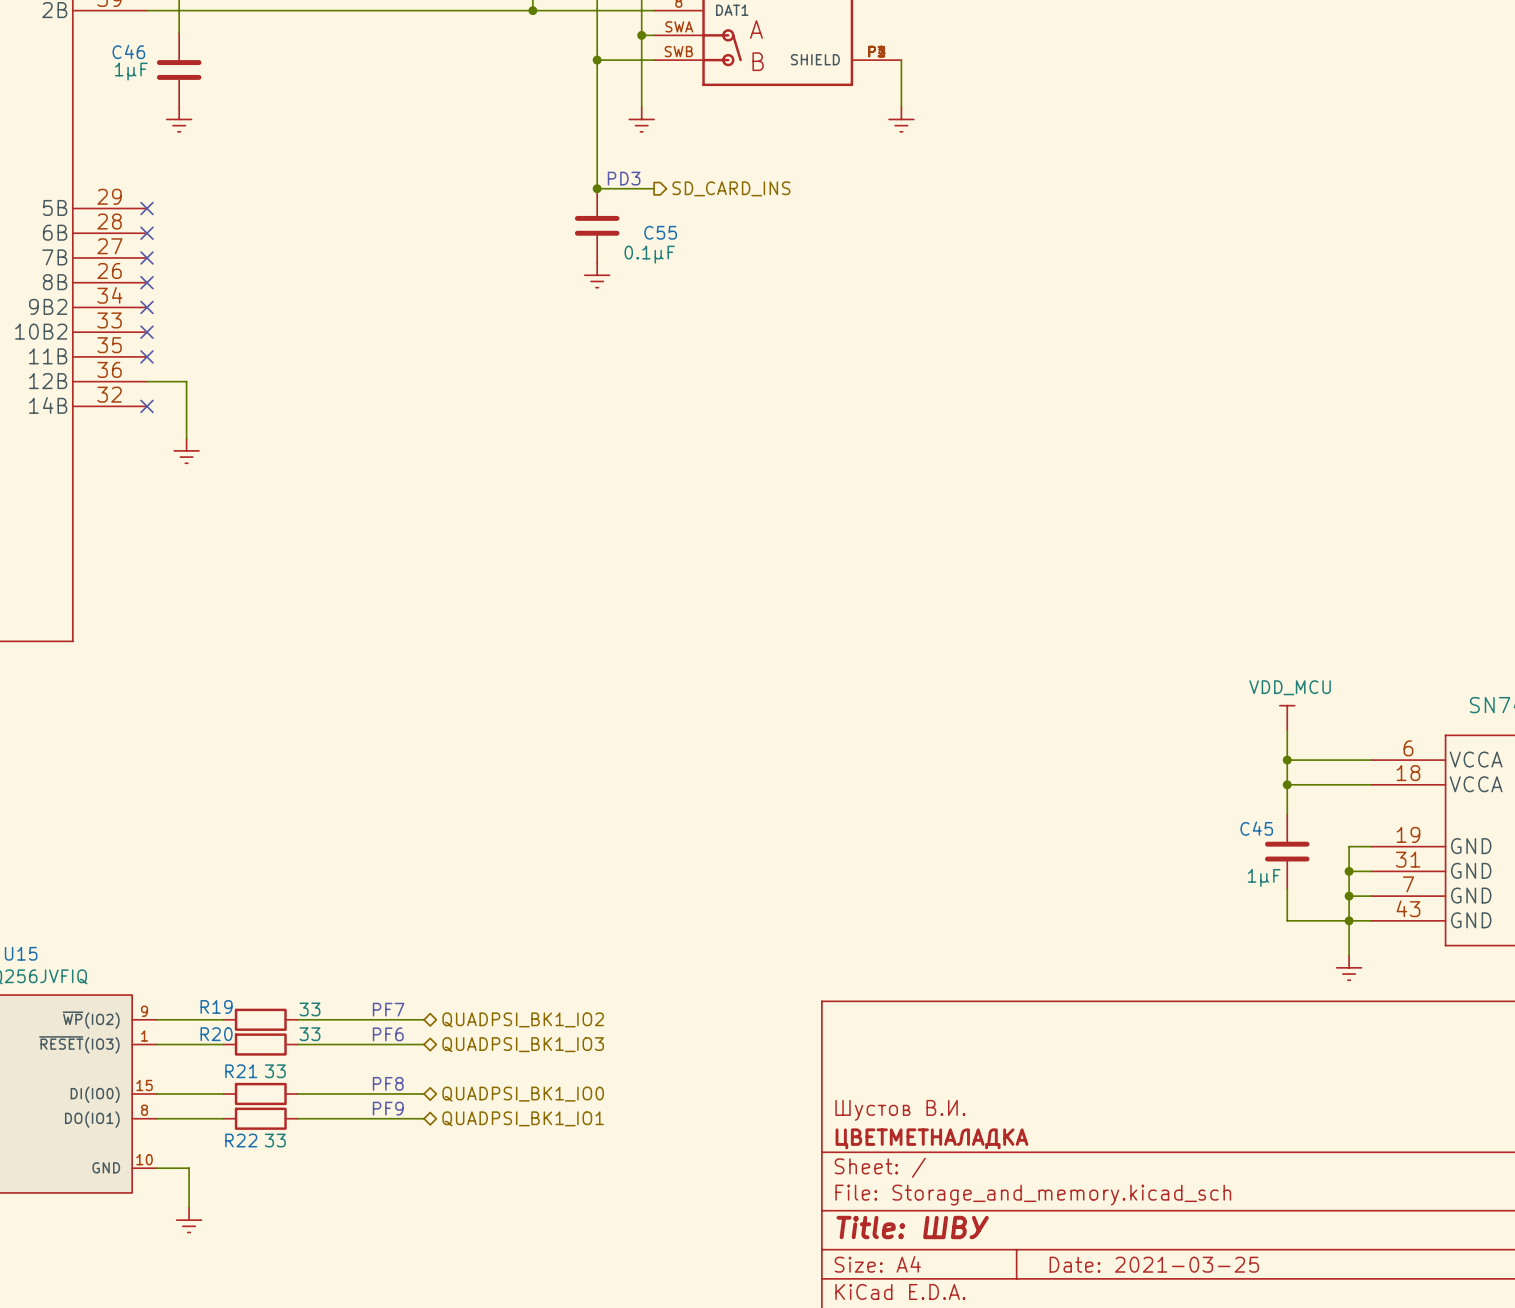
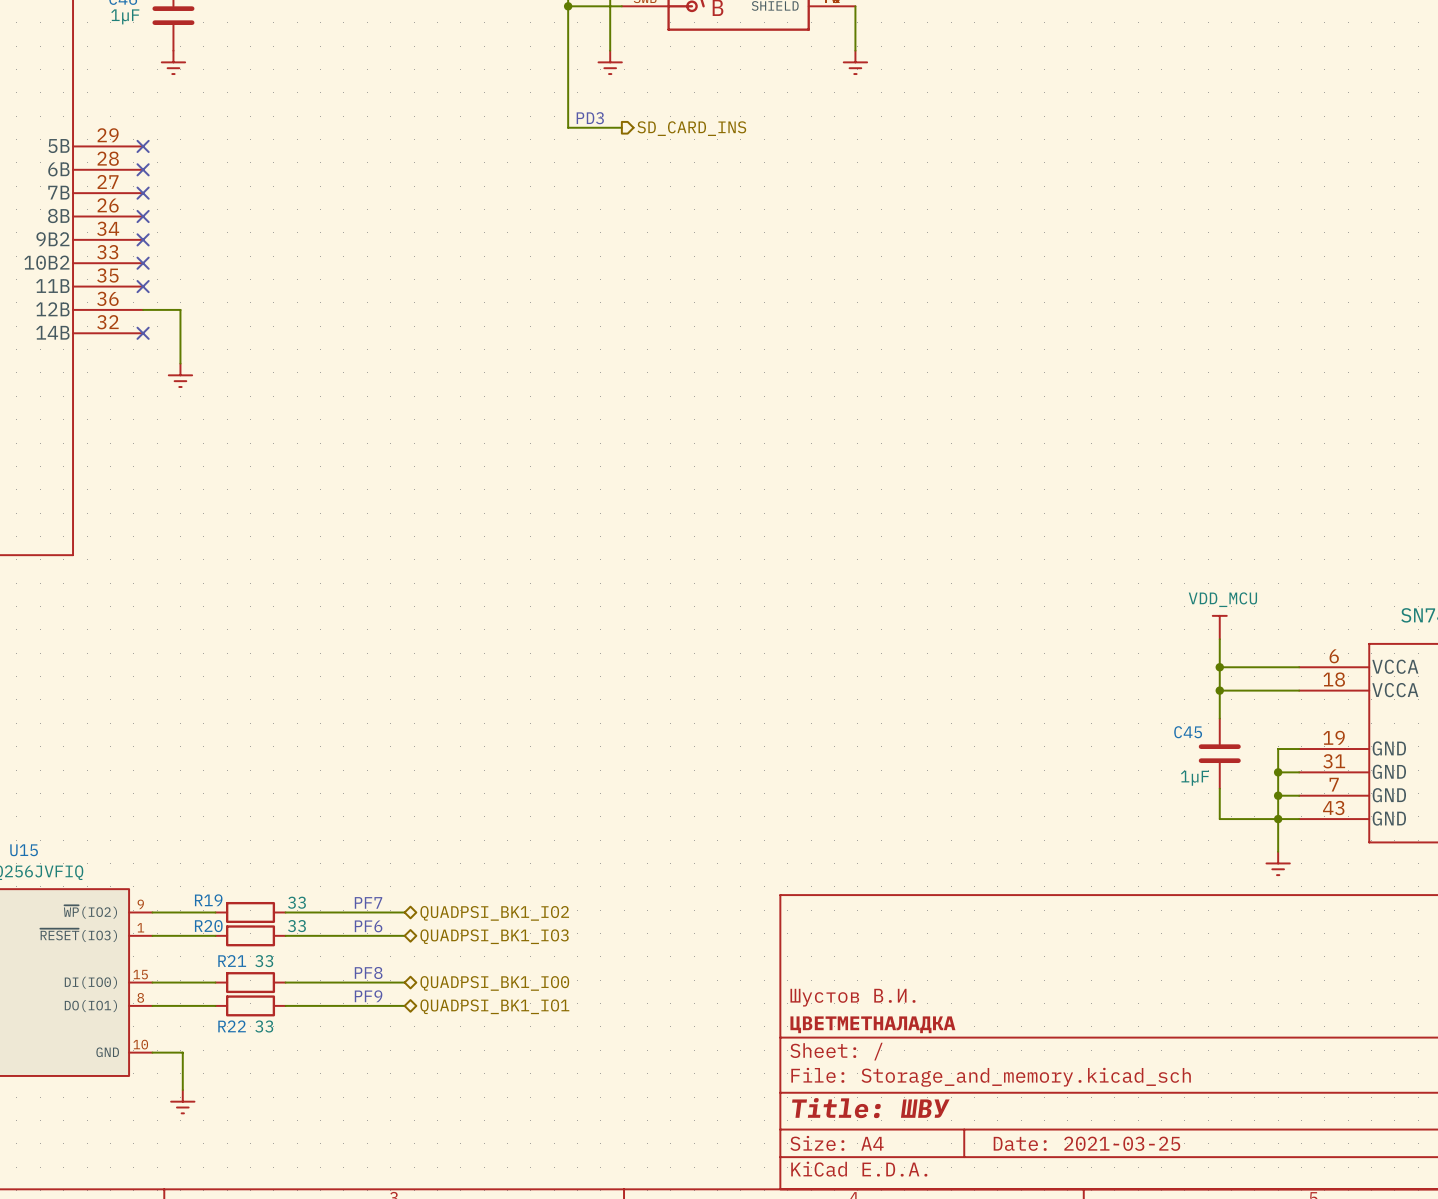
junction: (597, 188) -> none
C55: 0.1µF (597, 225) -> none
power symbol: (597, 275) -> none

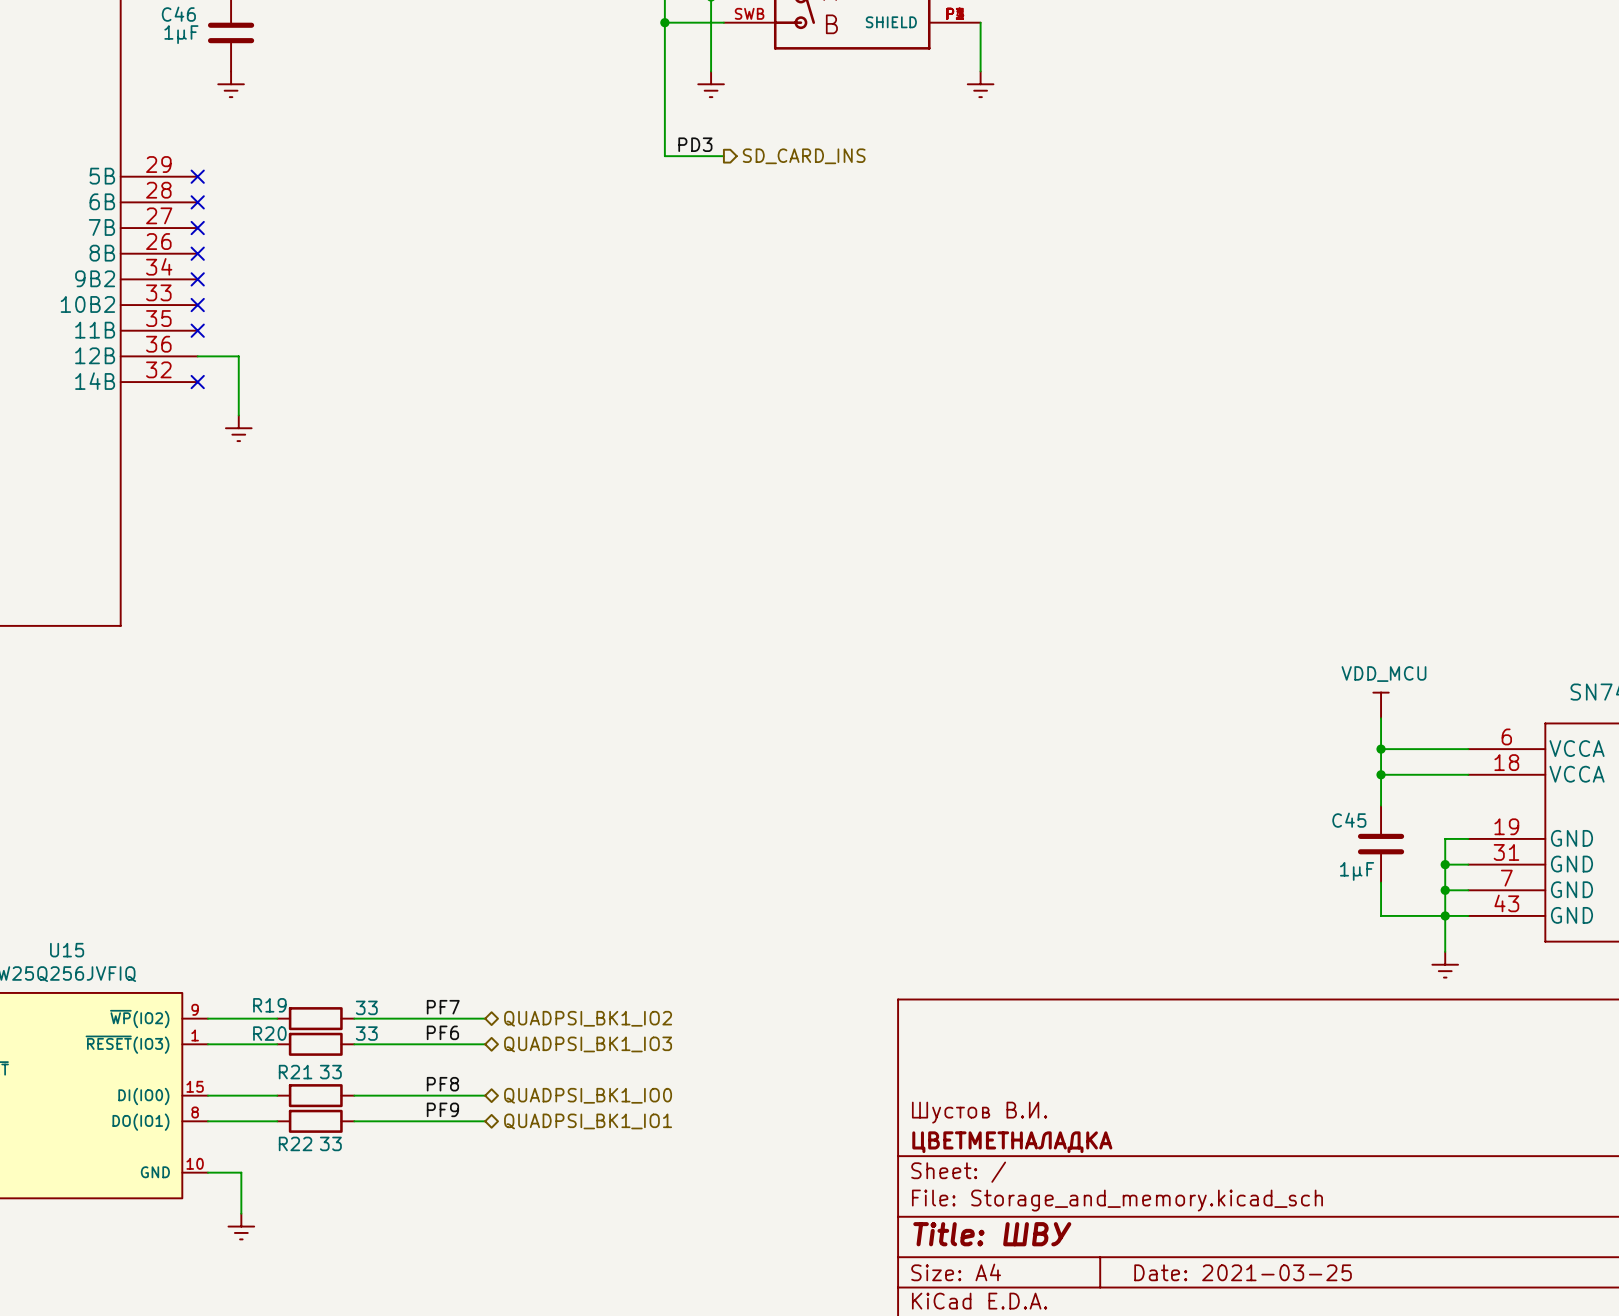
label: none -> PD3 (695, 144)
text: PD3 (590, 118) -> none
label: none -> PF7 (443, 1007)
text: PF7 (368, 902) -> none
label: none -> PF6 (442, 1032)
text: PF6 (368, 926) -> none
label: none -> PF8 (442, 1084)
text: PF8 (368, 972) -> none
label: none -> PF9 (442, 1109)
text: PF9 (368, 996) -> none

